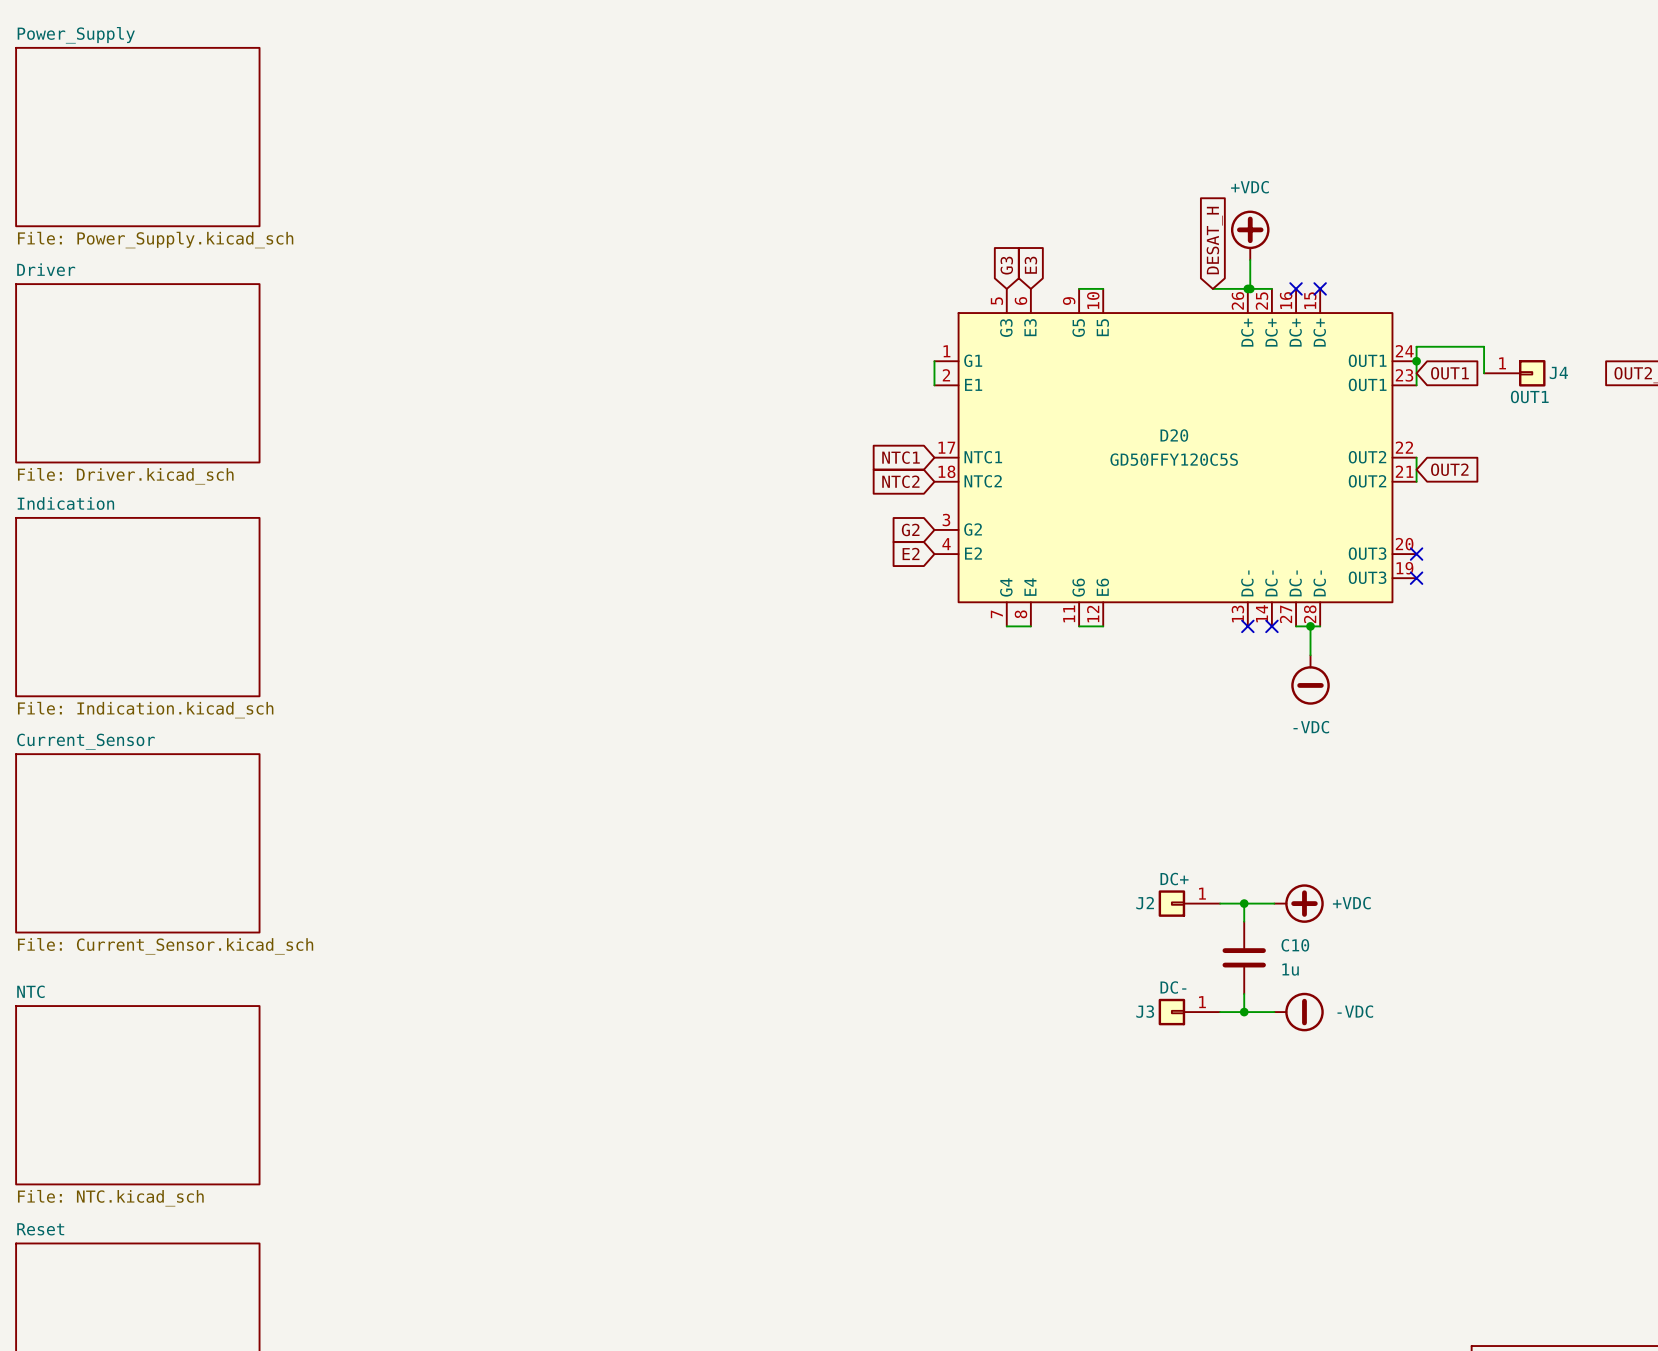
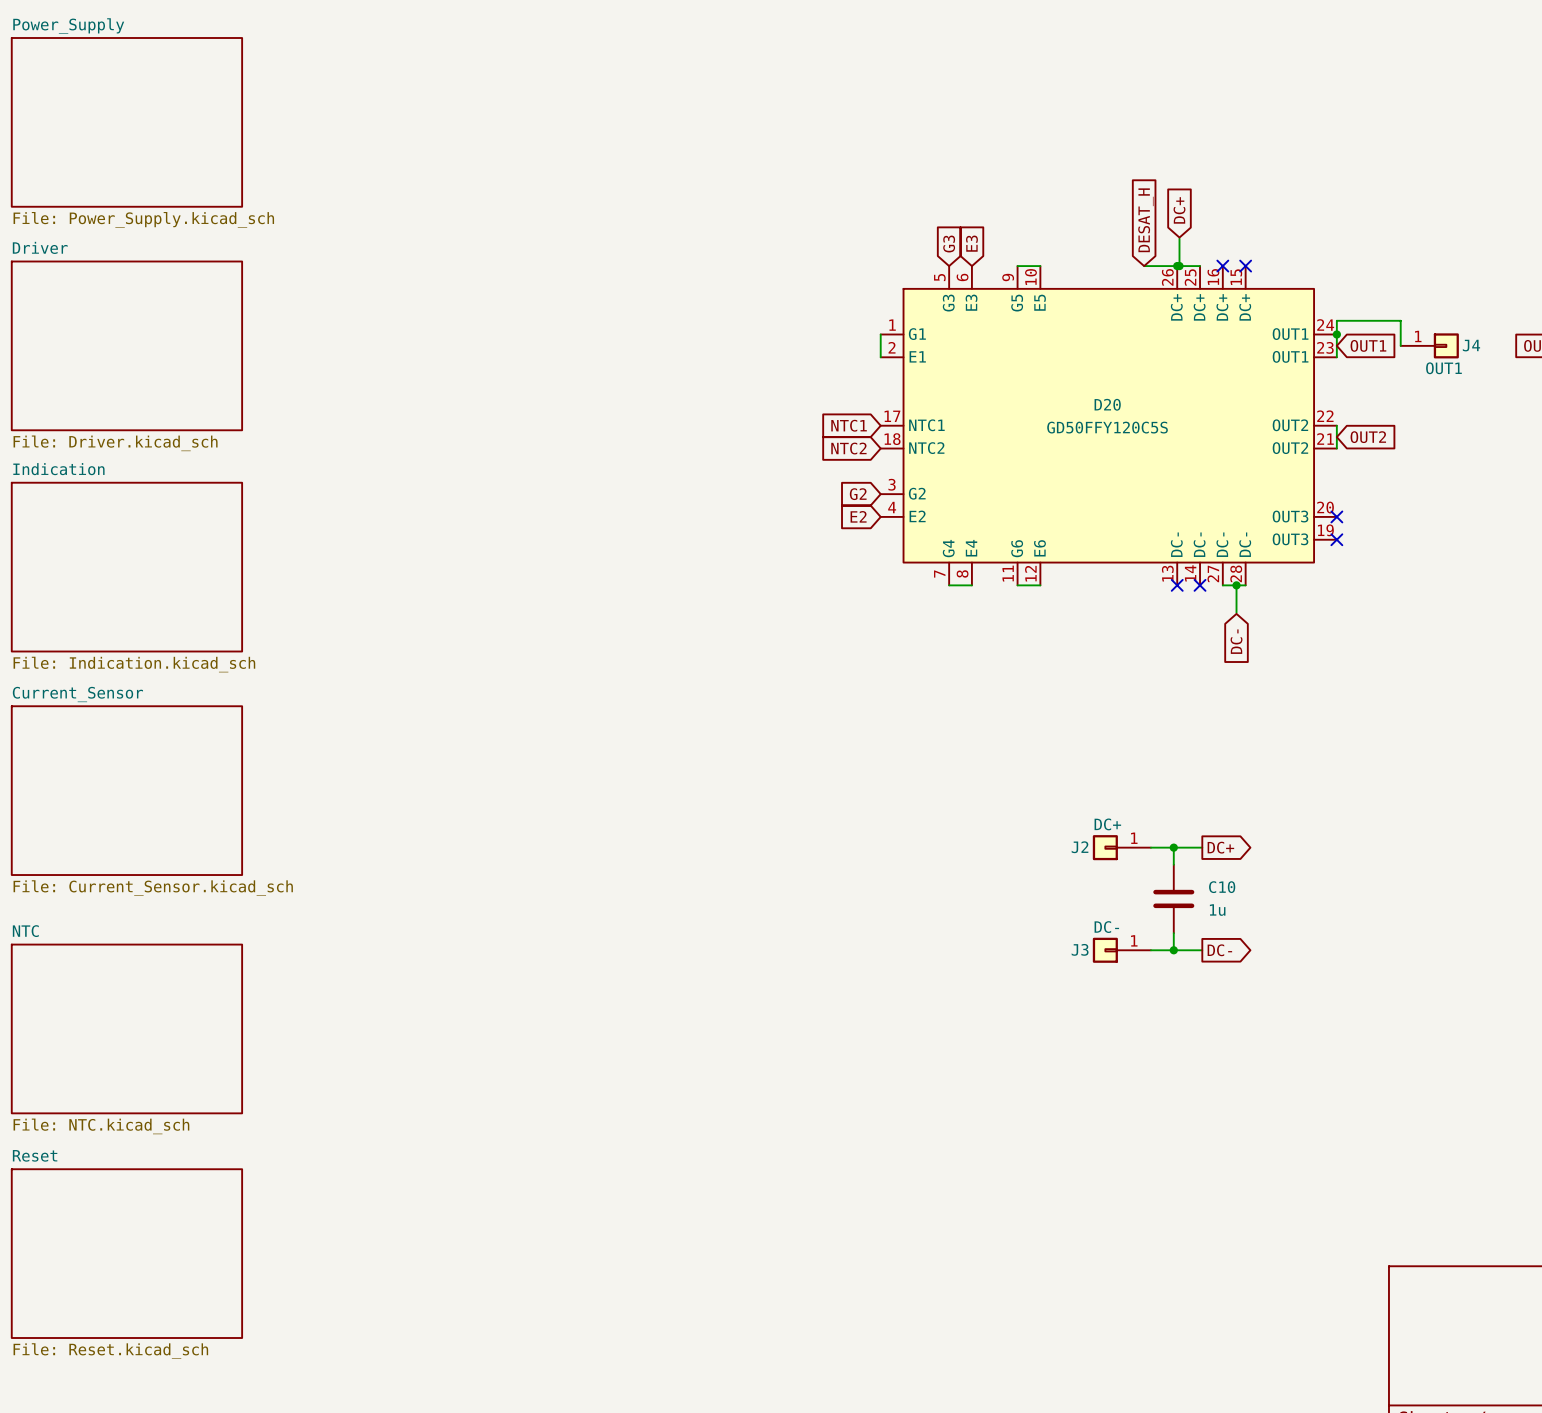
global label: none -> DC+ (1179, 210)
power symbol: +VDC (1250, 235) -> none
power symbol: -VDC (1310, 680) -> none
global label: none -> DC- (1236, 641)
global label: none -> DC+ (1220, 847)
power symbol: +VDC (1299, 903) -> none
global label: none -> DC- (1219, 950)
power symbol: -VDC (1299, 1012) -> none

